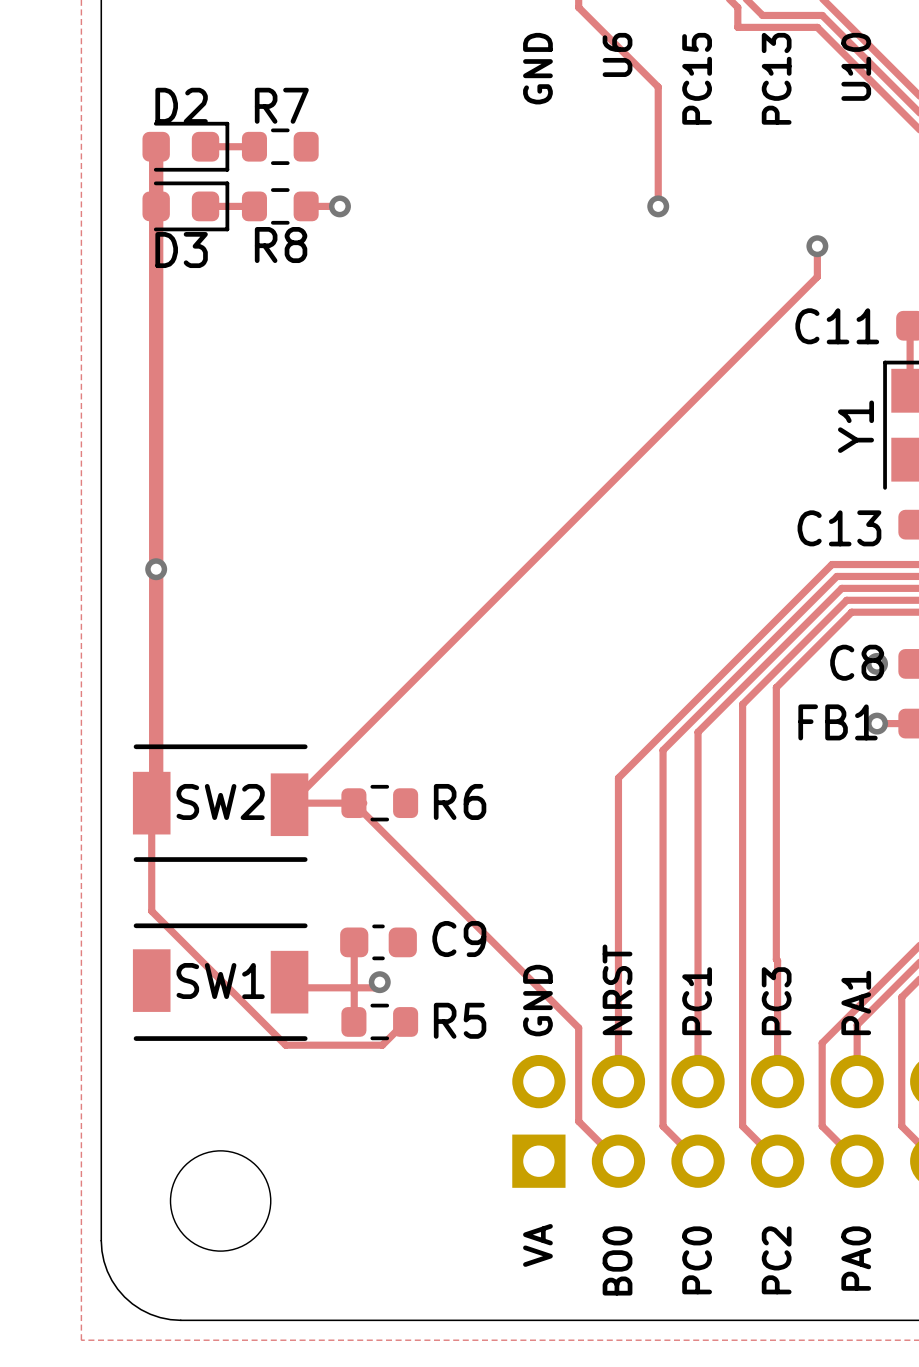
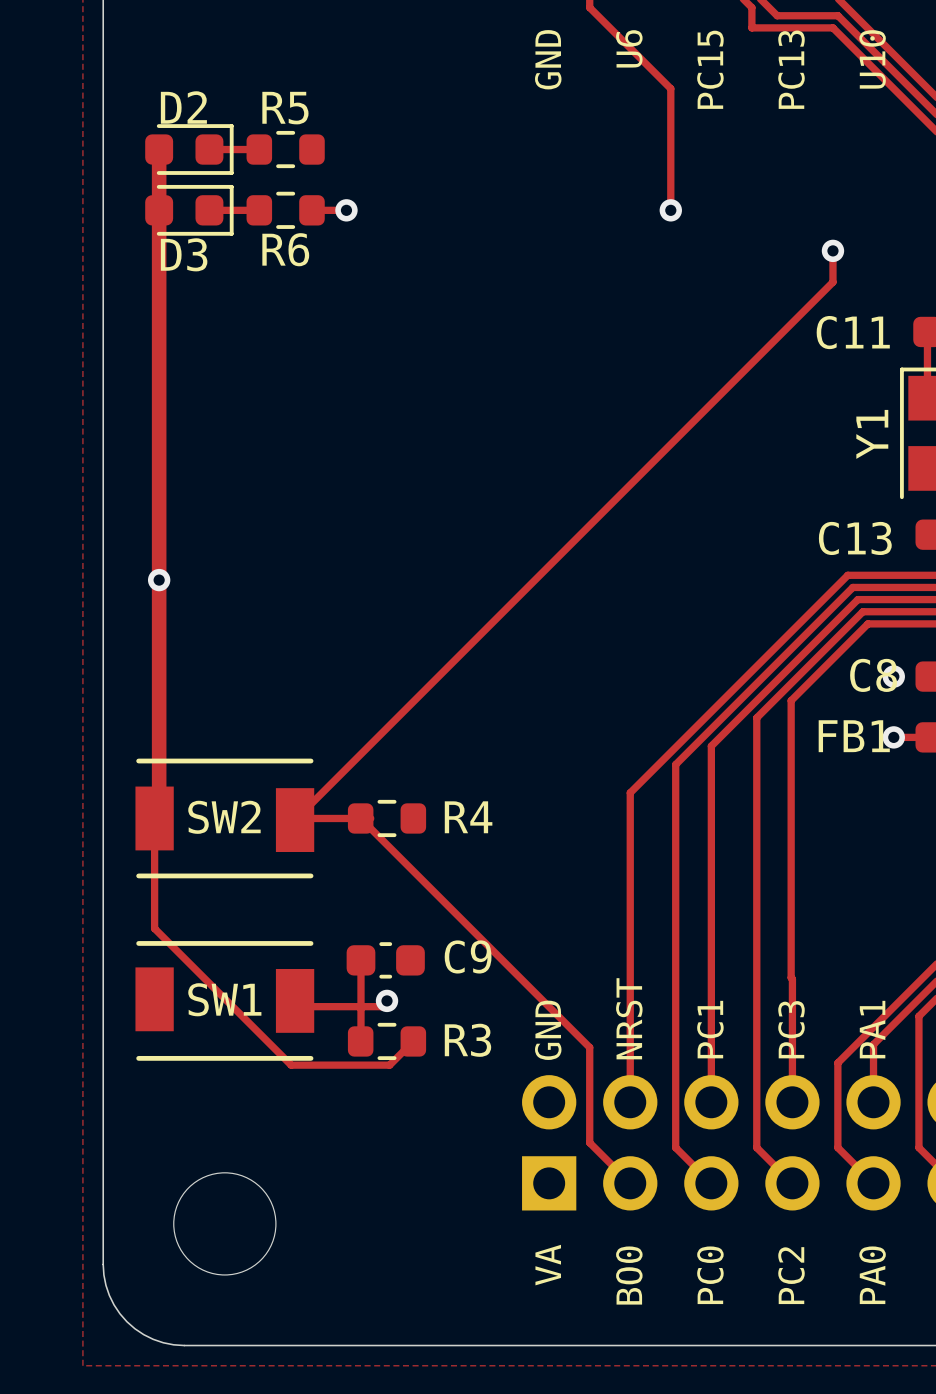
R7 name: R7 (281, 105) -> R5 (285, 108)
R8 name: R8 (281, 245) -> R6 (285, 249)
R6 name: R6 (460, 801) -> R4 (468, 817)
R5 name: R5 (460, 1020) -> R3 (467, 1040)

